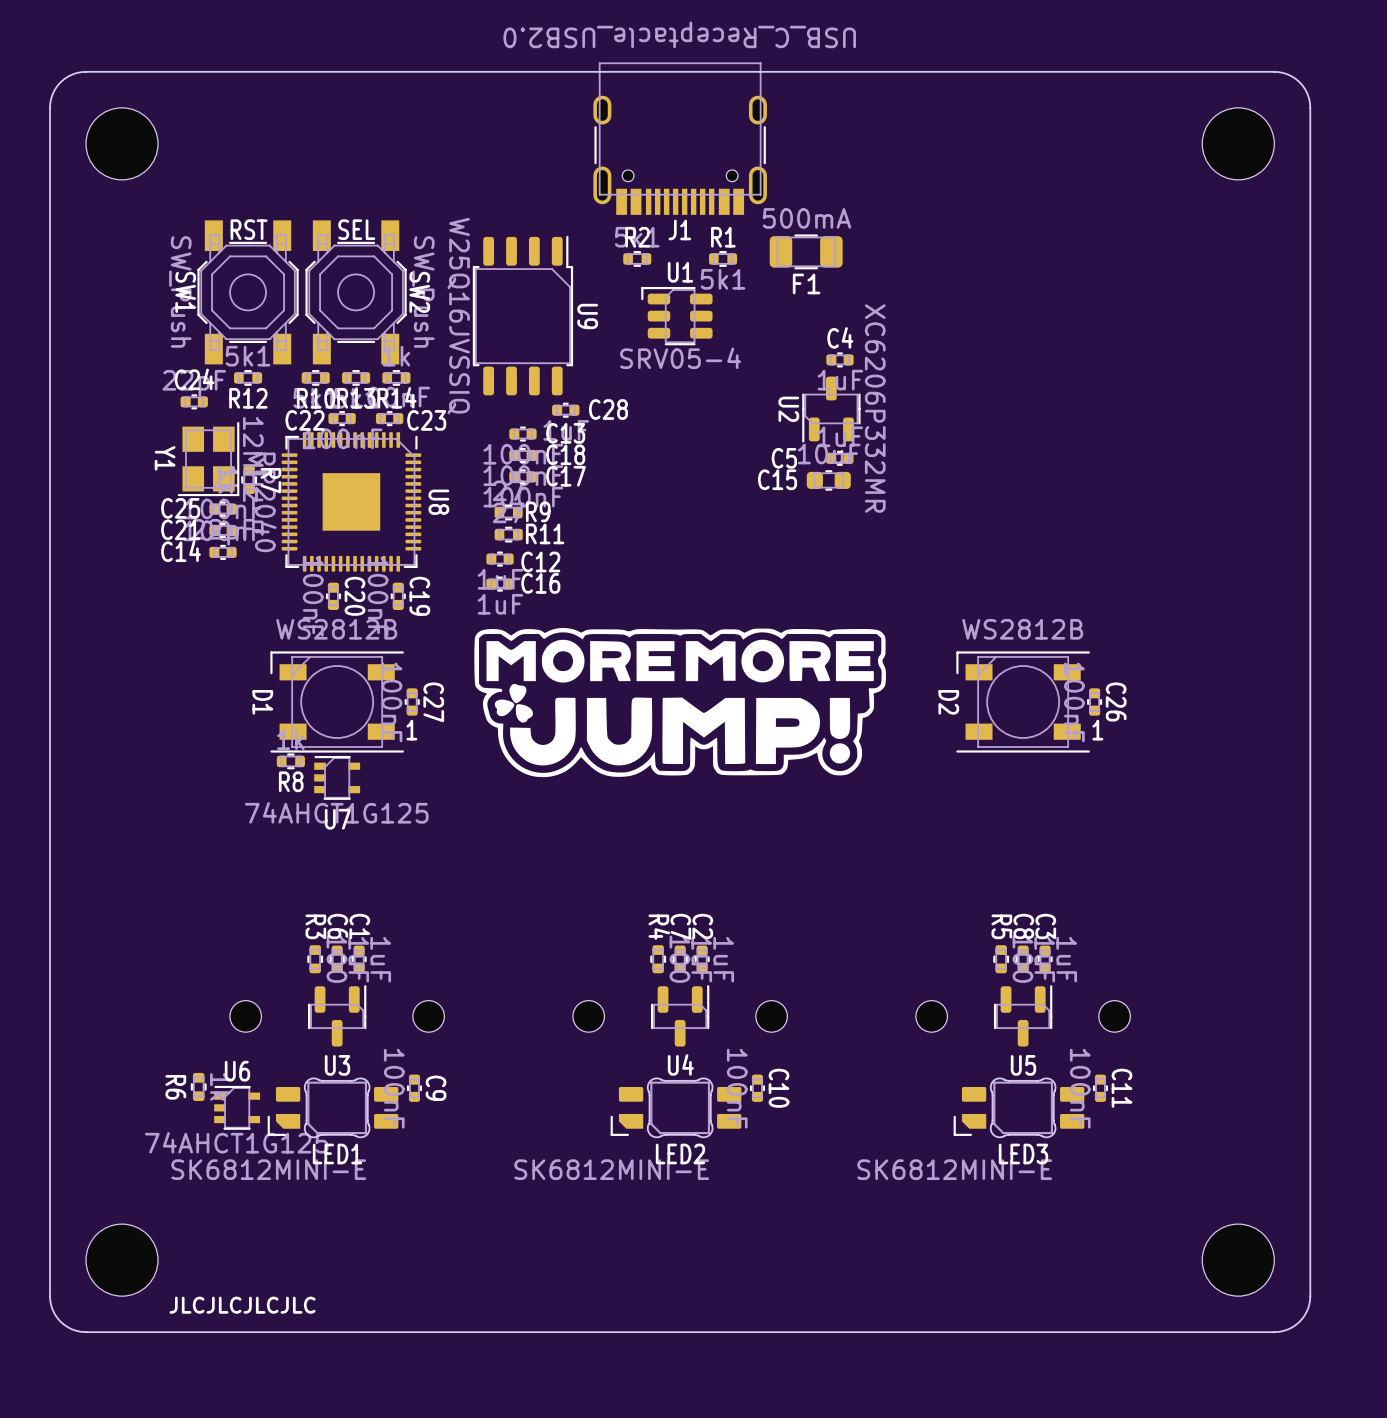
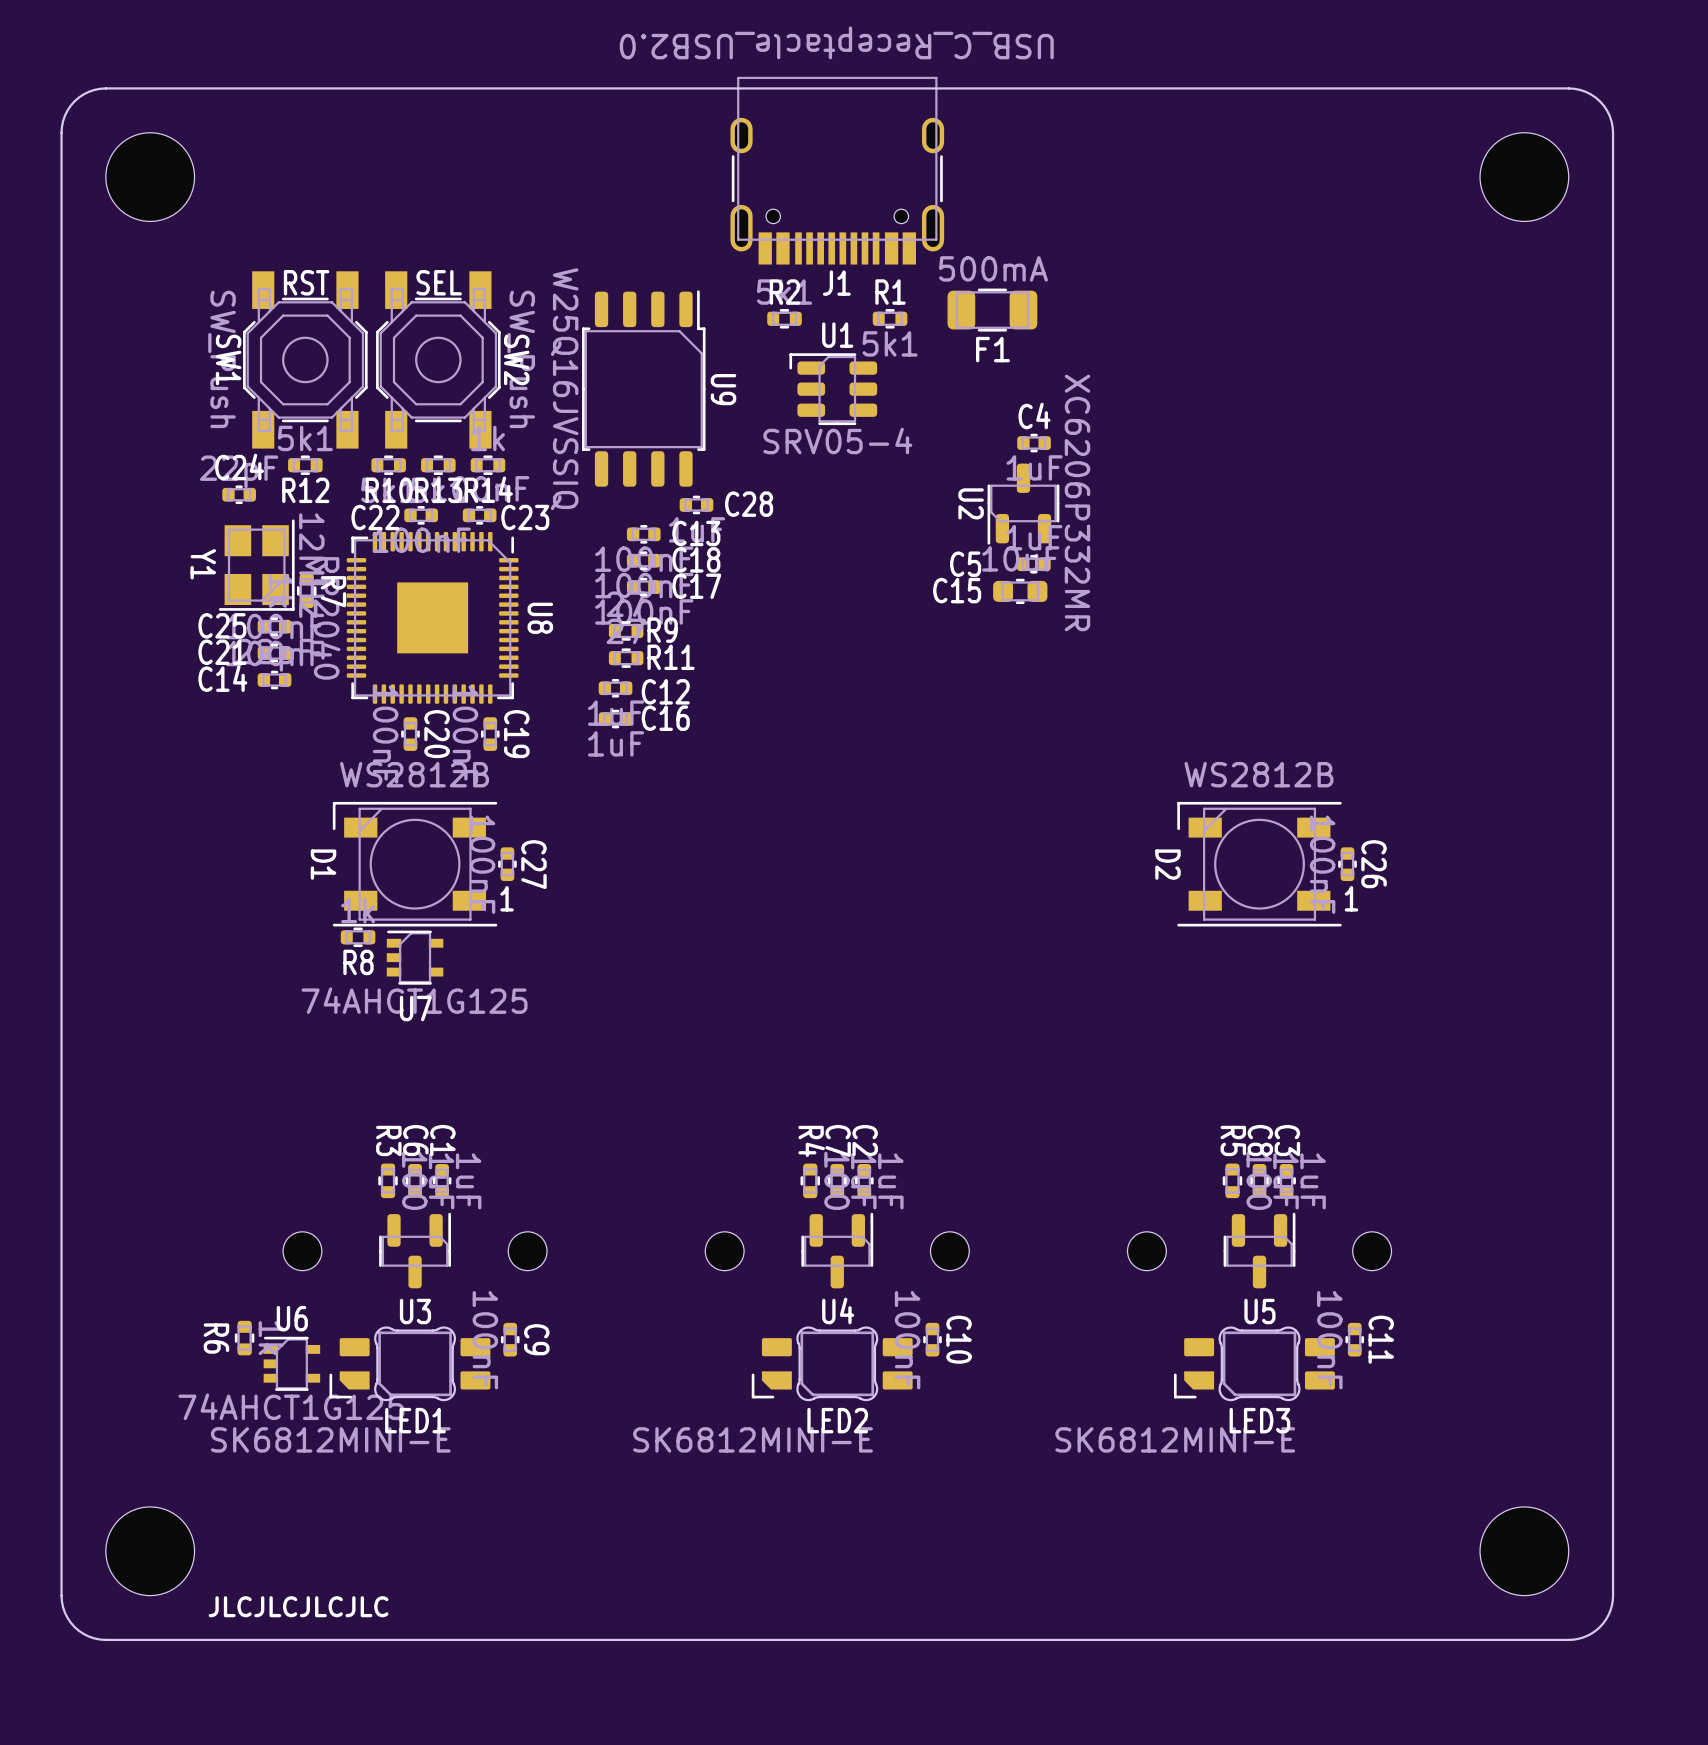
drawing: [474, 628, 886, 778] -> none

